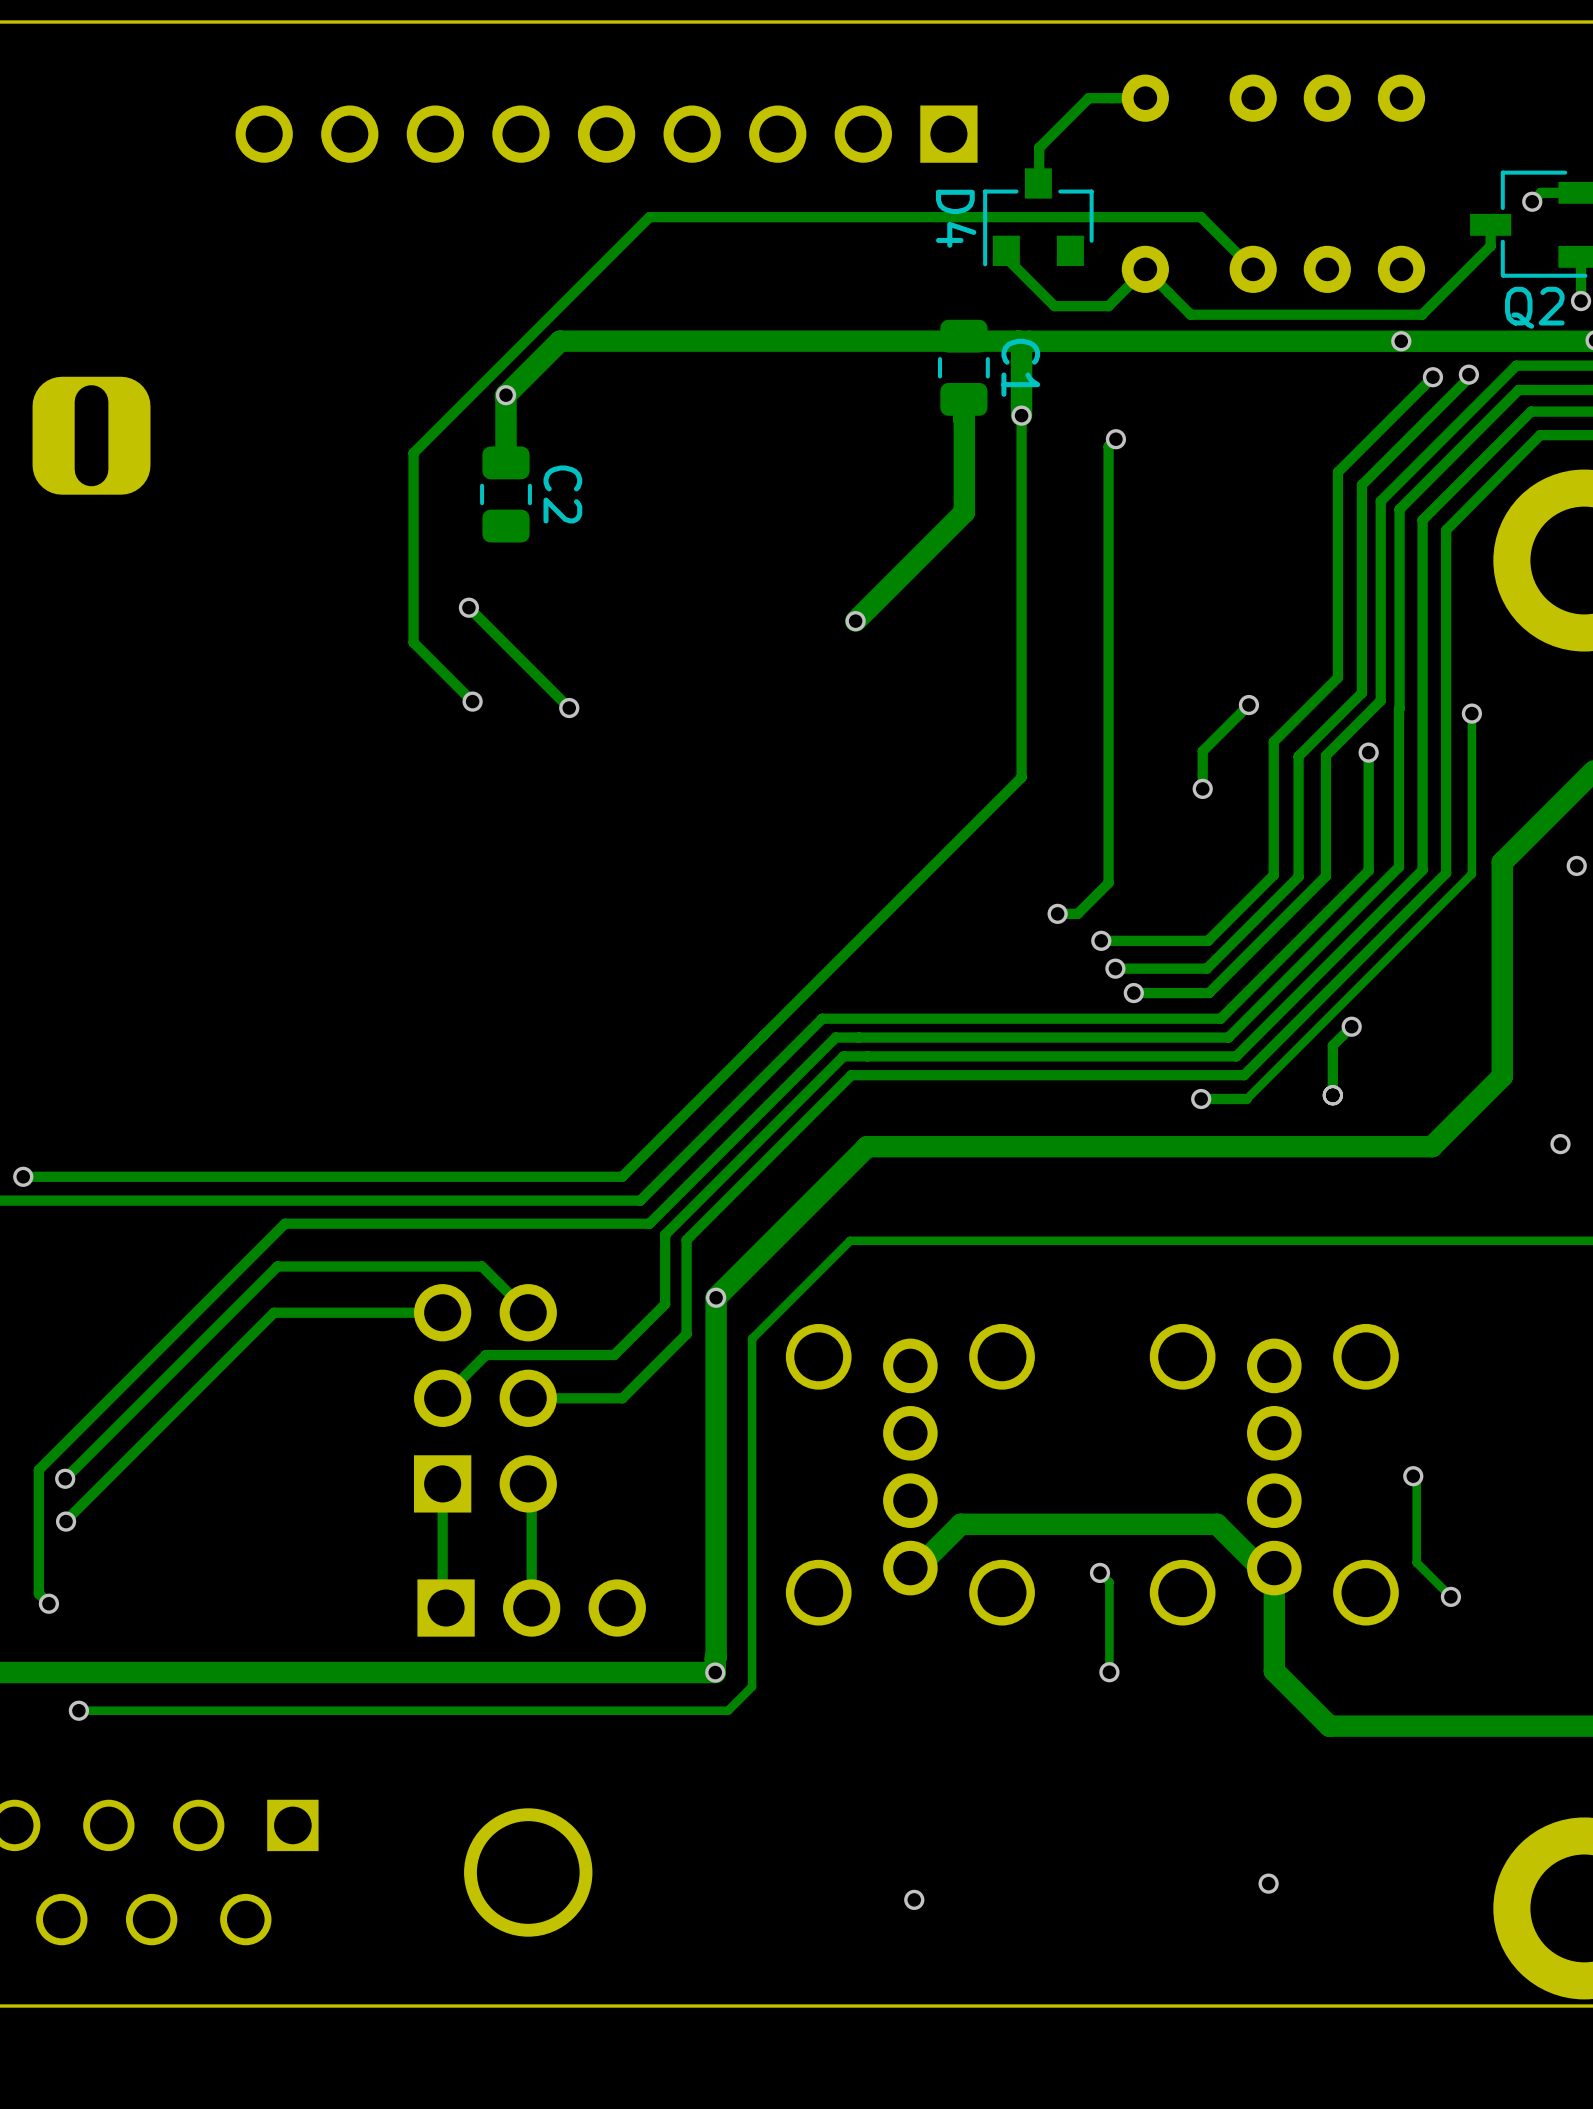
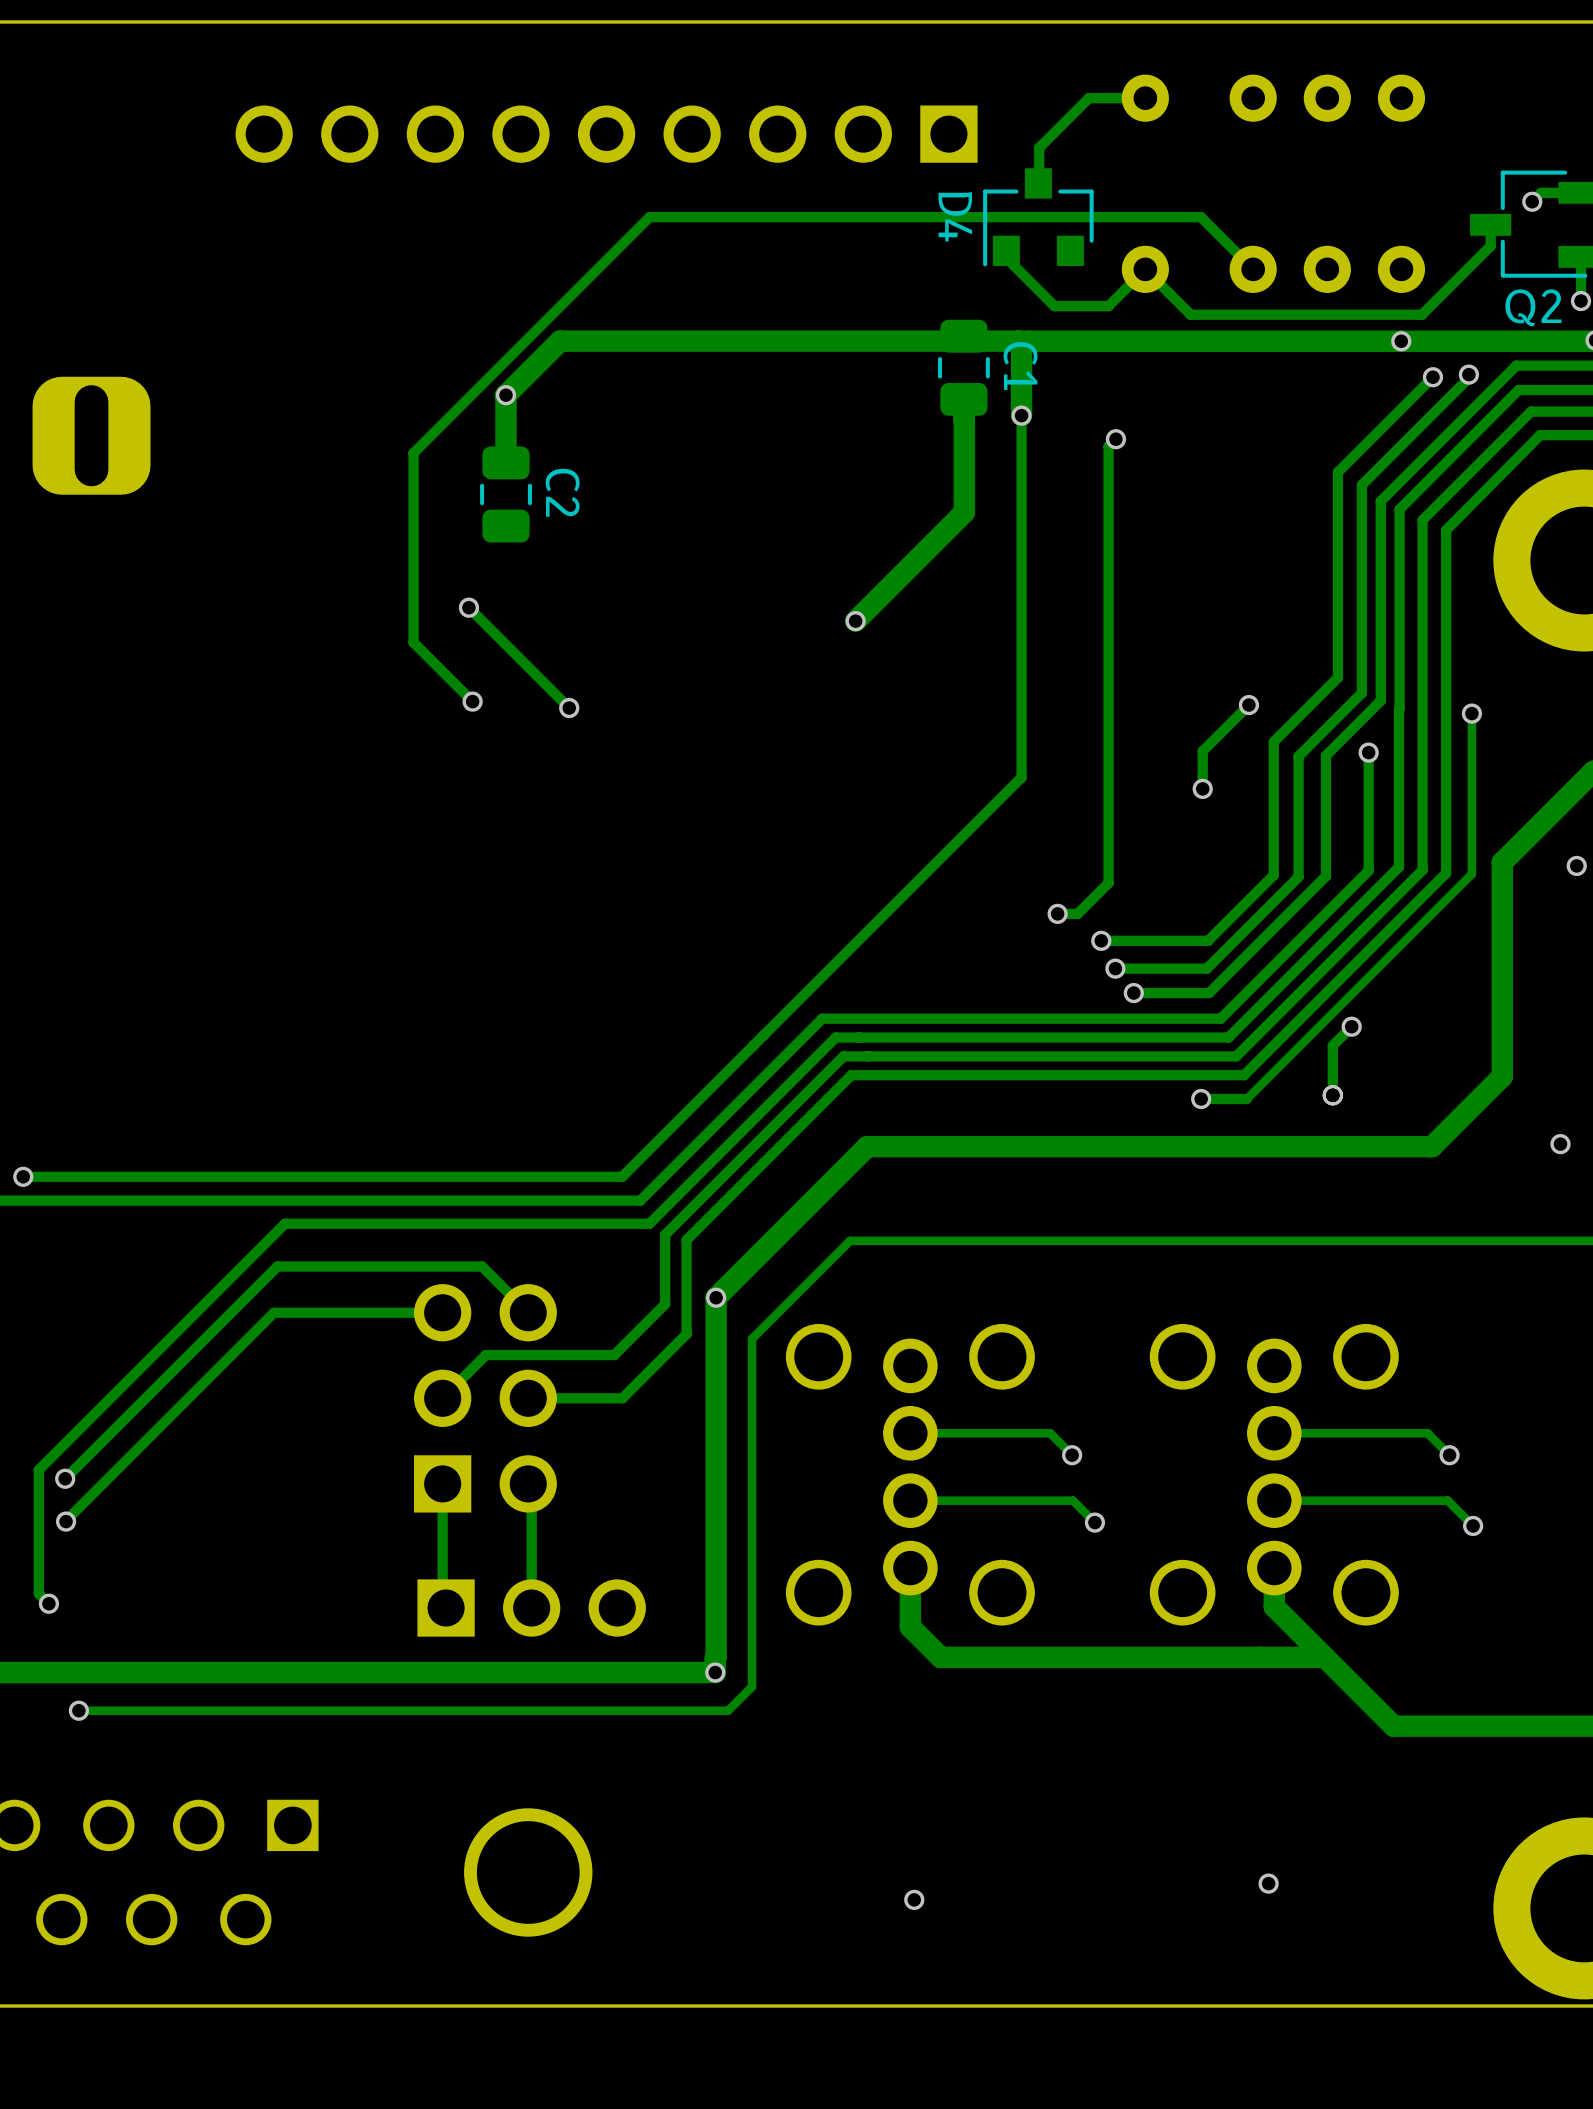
track: none -> (910, 1433) (1050, 1433) (1072, 1455)
track: none -> (1274, 1433) (1427, 1433) (1449, 1455)
via: none -> (1072, 1455)
via: none -> (1449, 1455)
track: (1413, 1476) (1416, 1479) (1416, 1562) (1450, 1596) -> none
via: (1413, 1476) -> none
track: none -> (910, 1500) (1073, 1500) (1094, 1522)
track: none -> (1274, 1500) (1447, 1500) (1473, 1525)
via: none -> (1473, 1525)
track: (1274, 1568) (1260, 1568) (1217, 1524) (960, 1524) (917, 1568) (910, 1568) -> (1324, 1657) (940, 1657) (910, 1627) (910, 1568)
track: (1100, 1572) (1109, 1582) (1109, 1672) -> none
via position: (1100, 1572) -> (1094, 1522)
via: (1450, 1596) -> none
track: (1274, 1606) (1274, 1671) (1329, 1726) (1393, 1726) -> (1274, 1606) (1393, 1726)
via: (1109, 1672) -> none

